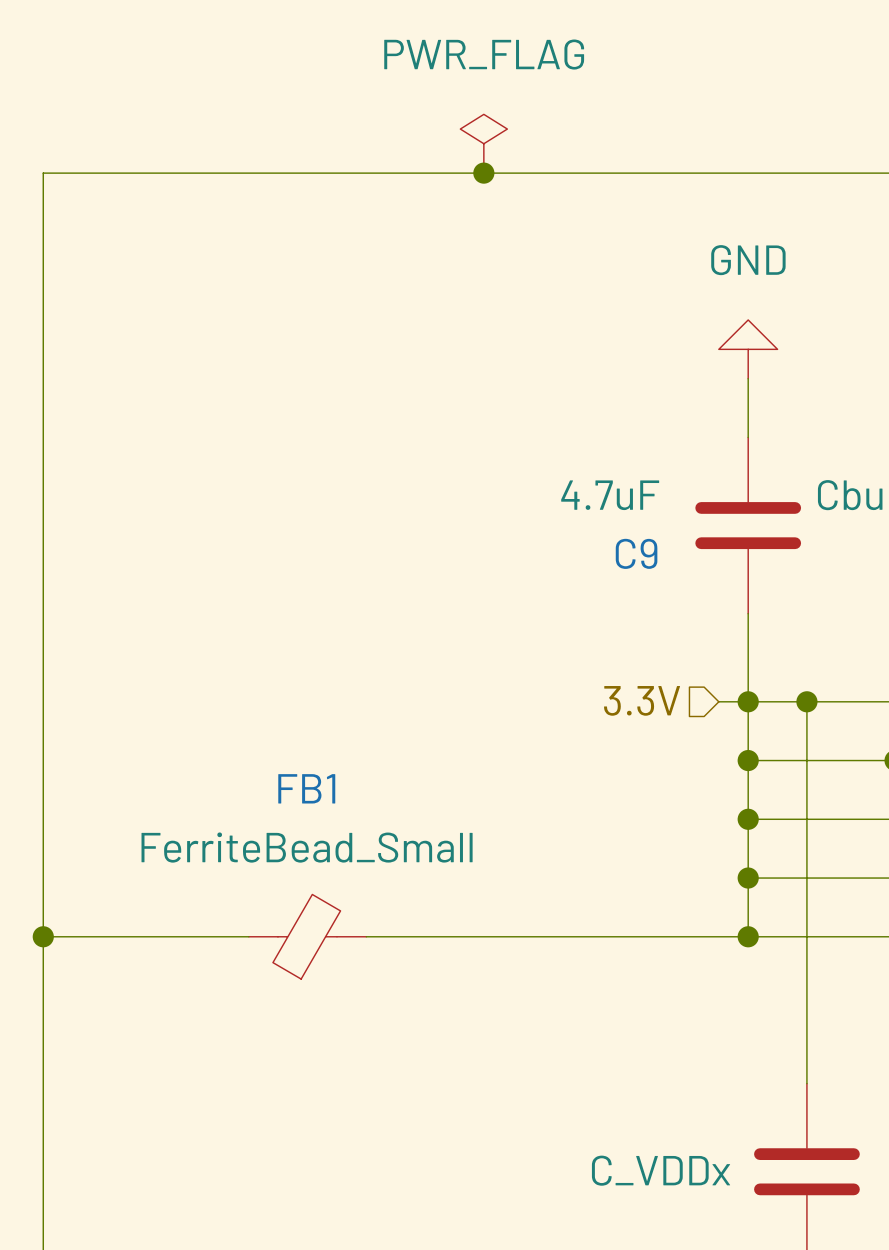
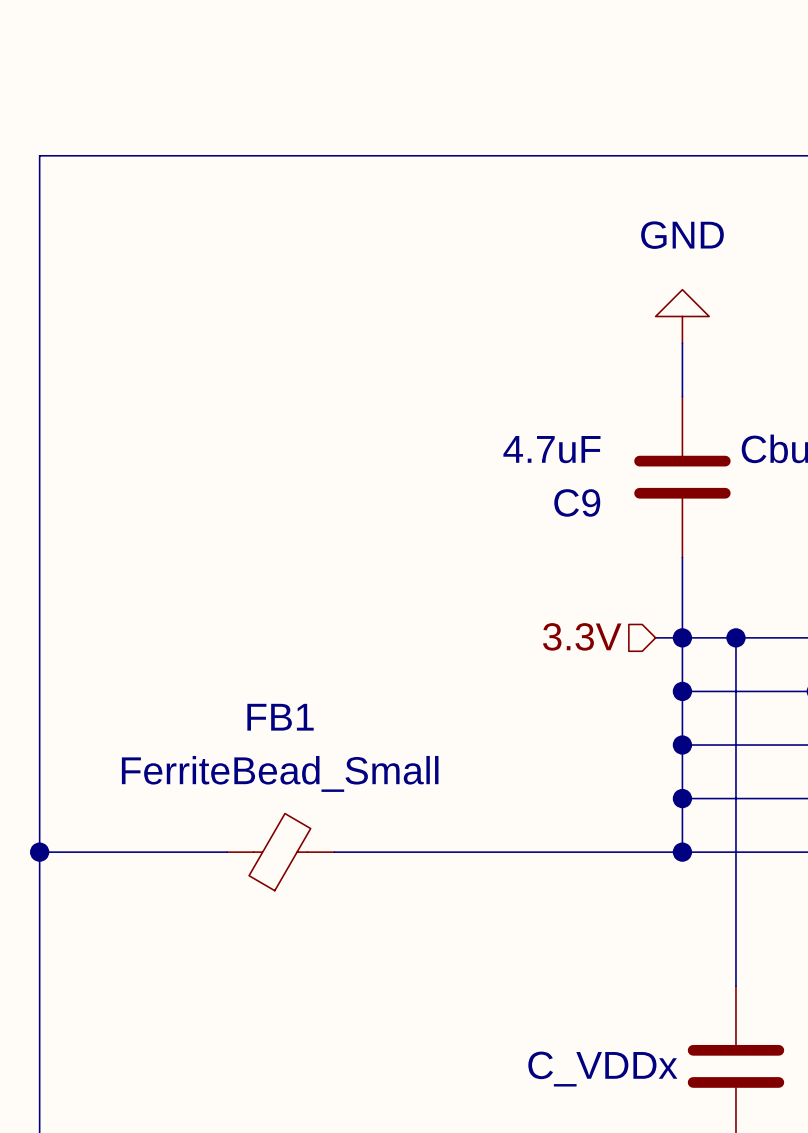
power symbol: PWR_FLAG (483, 143) -> none
junction: (483, 173) -> none

